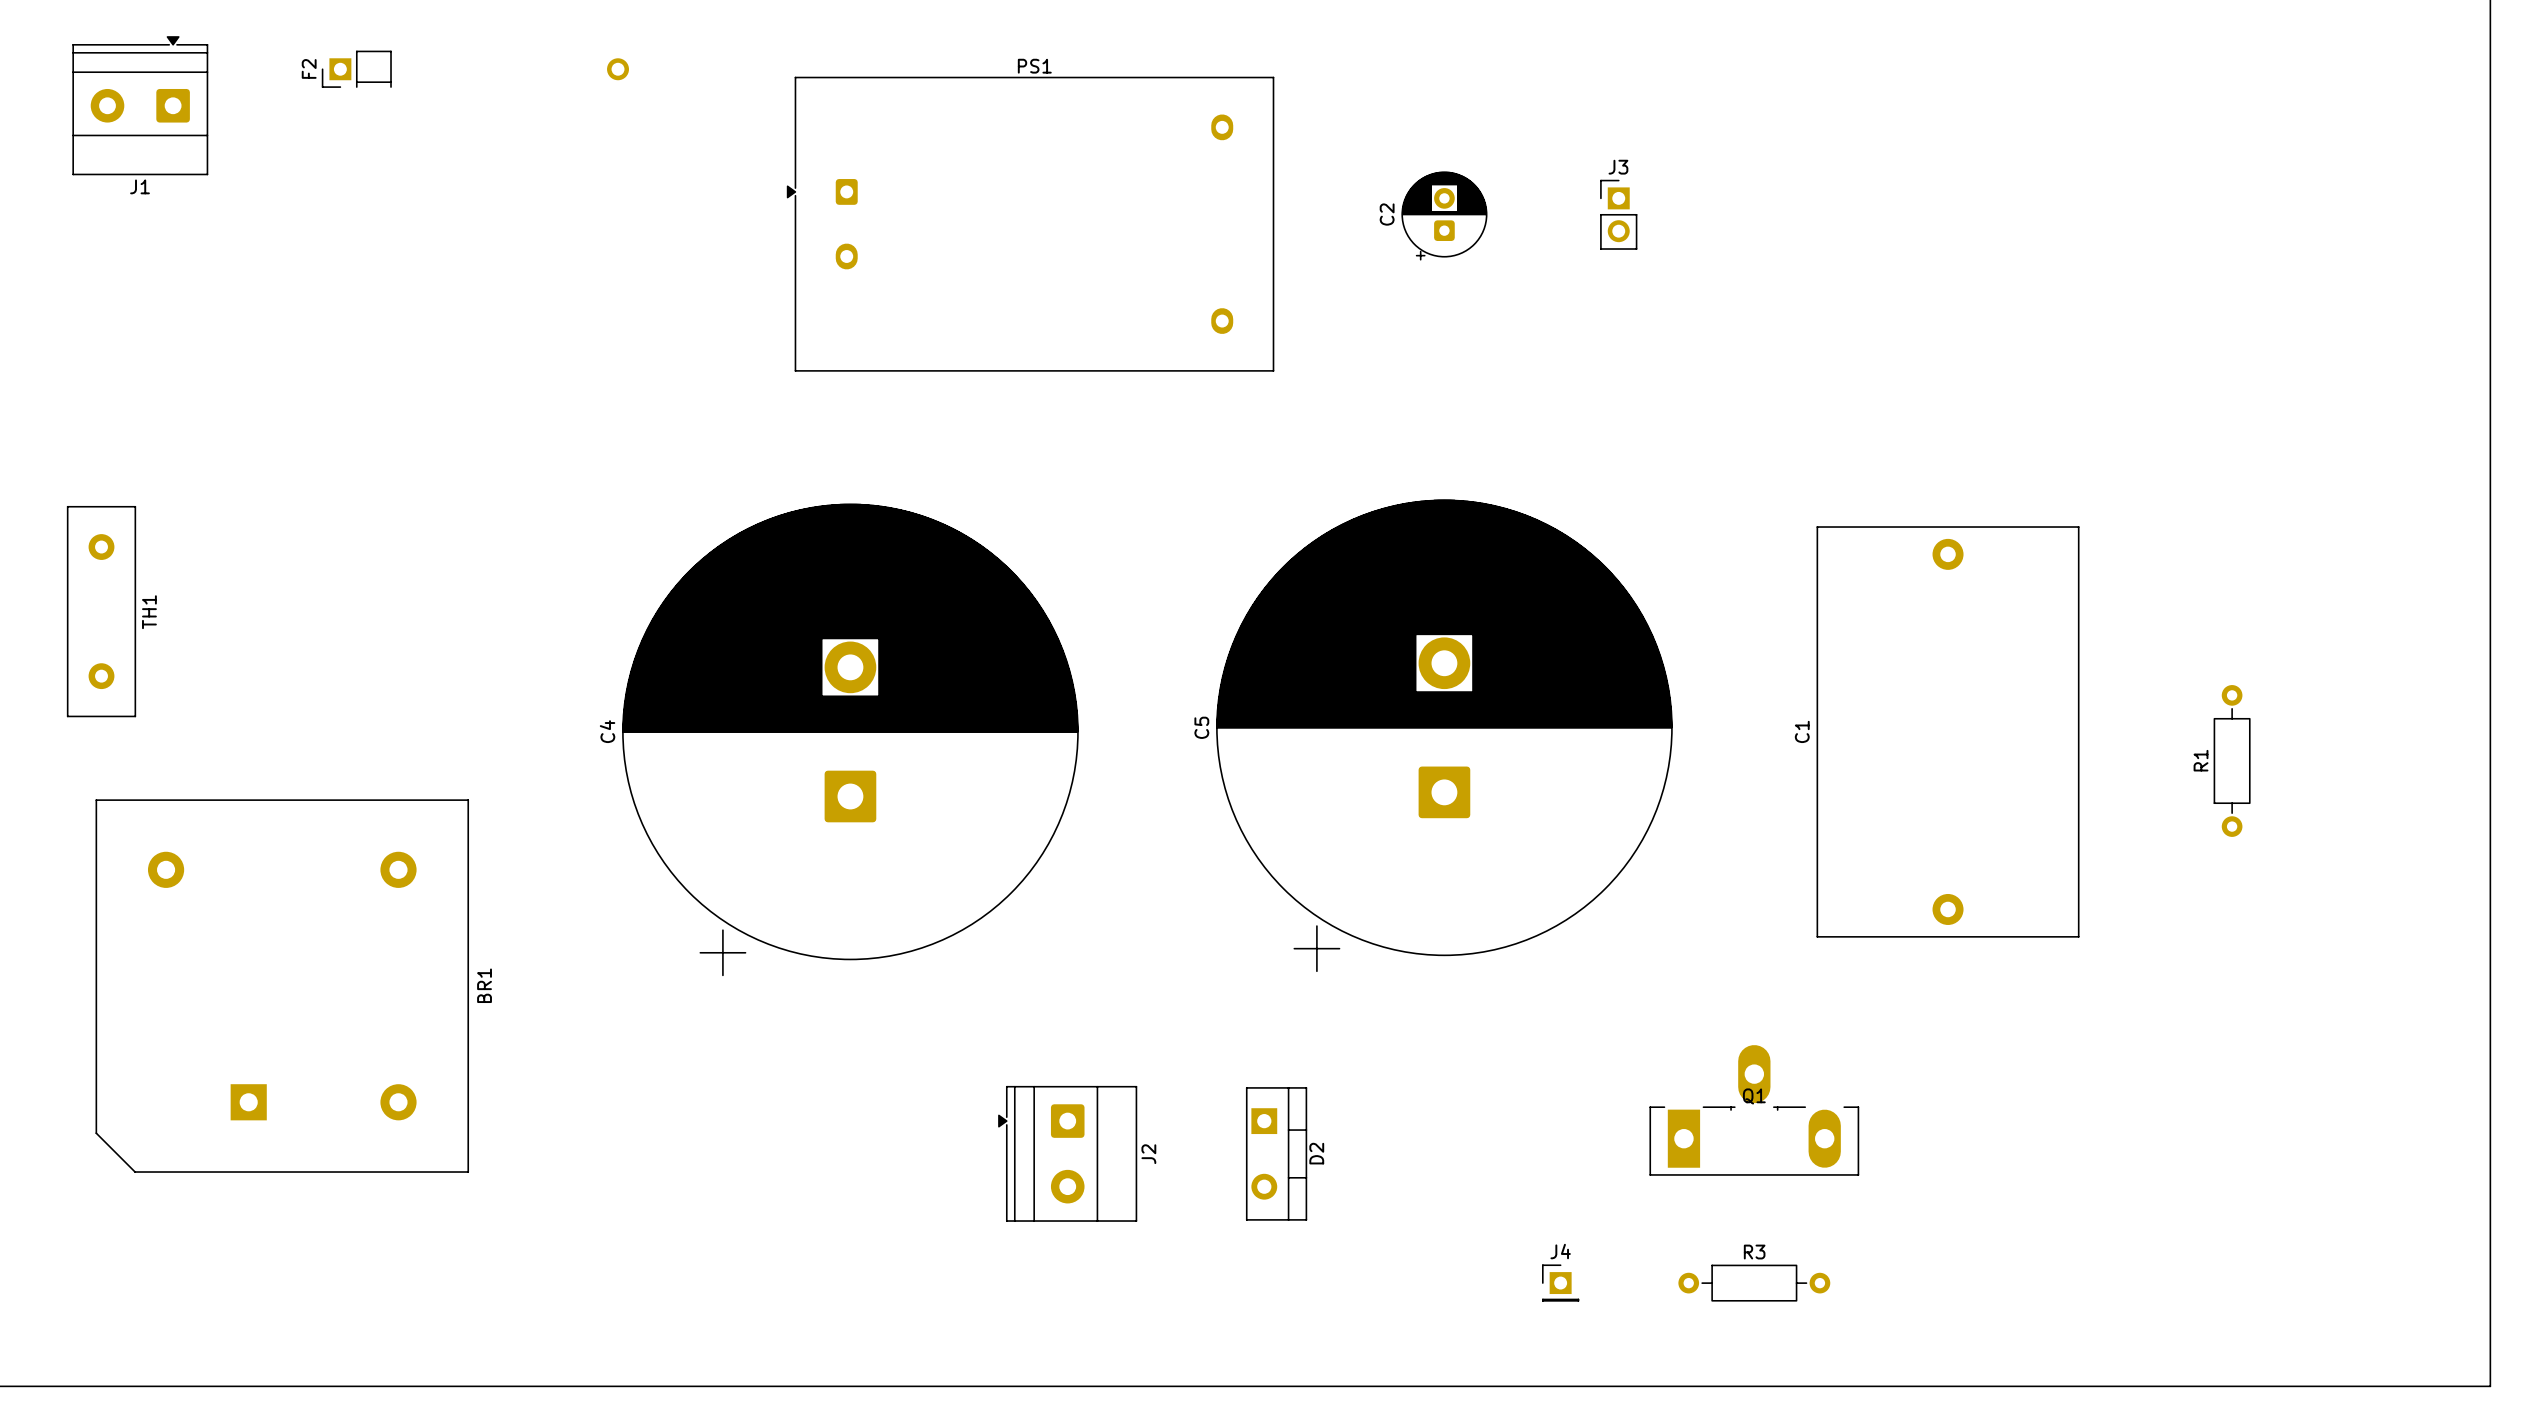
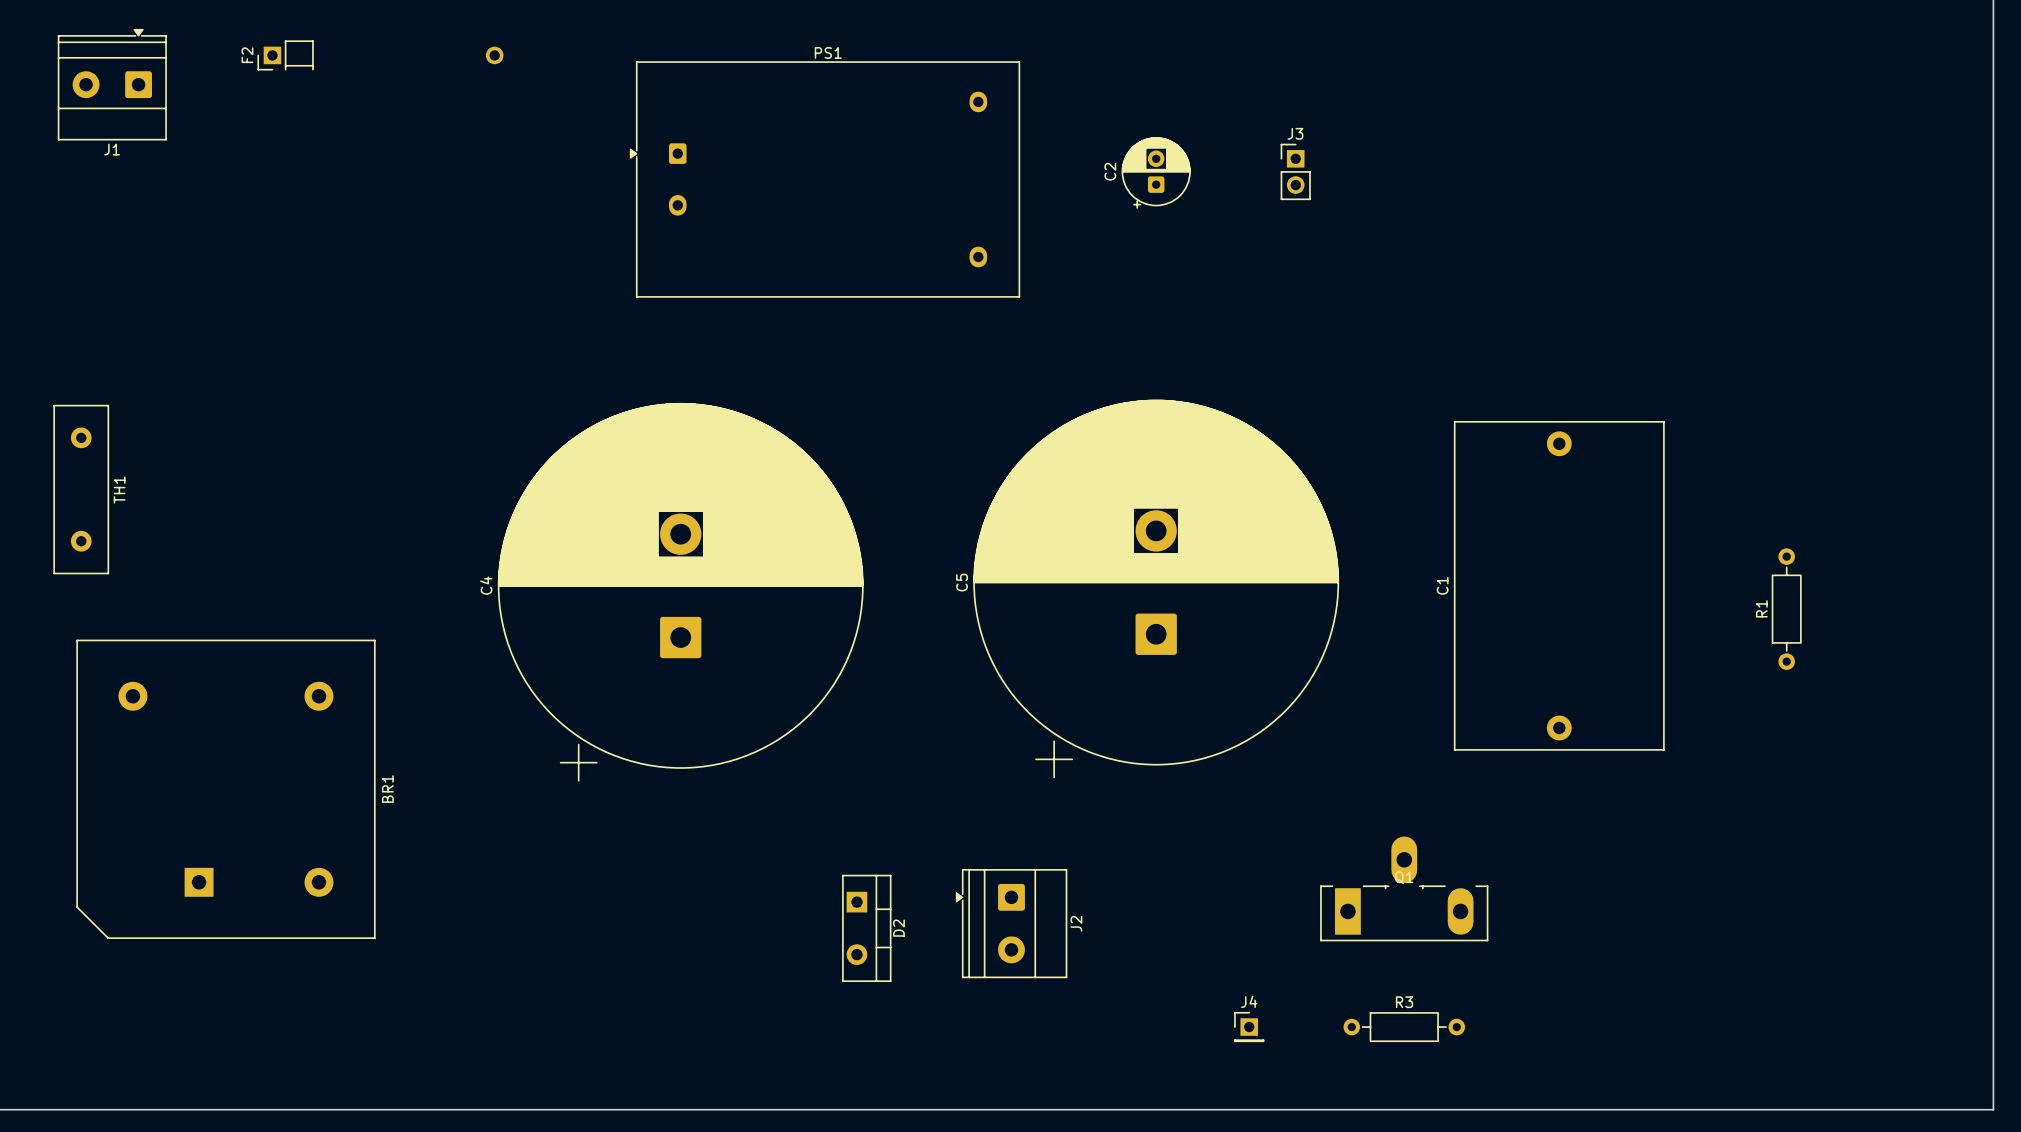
J2 position: (1067, 1153) -> (1011, 923)
D2 position: (1276, 1153) -> (866, 928)

